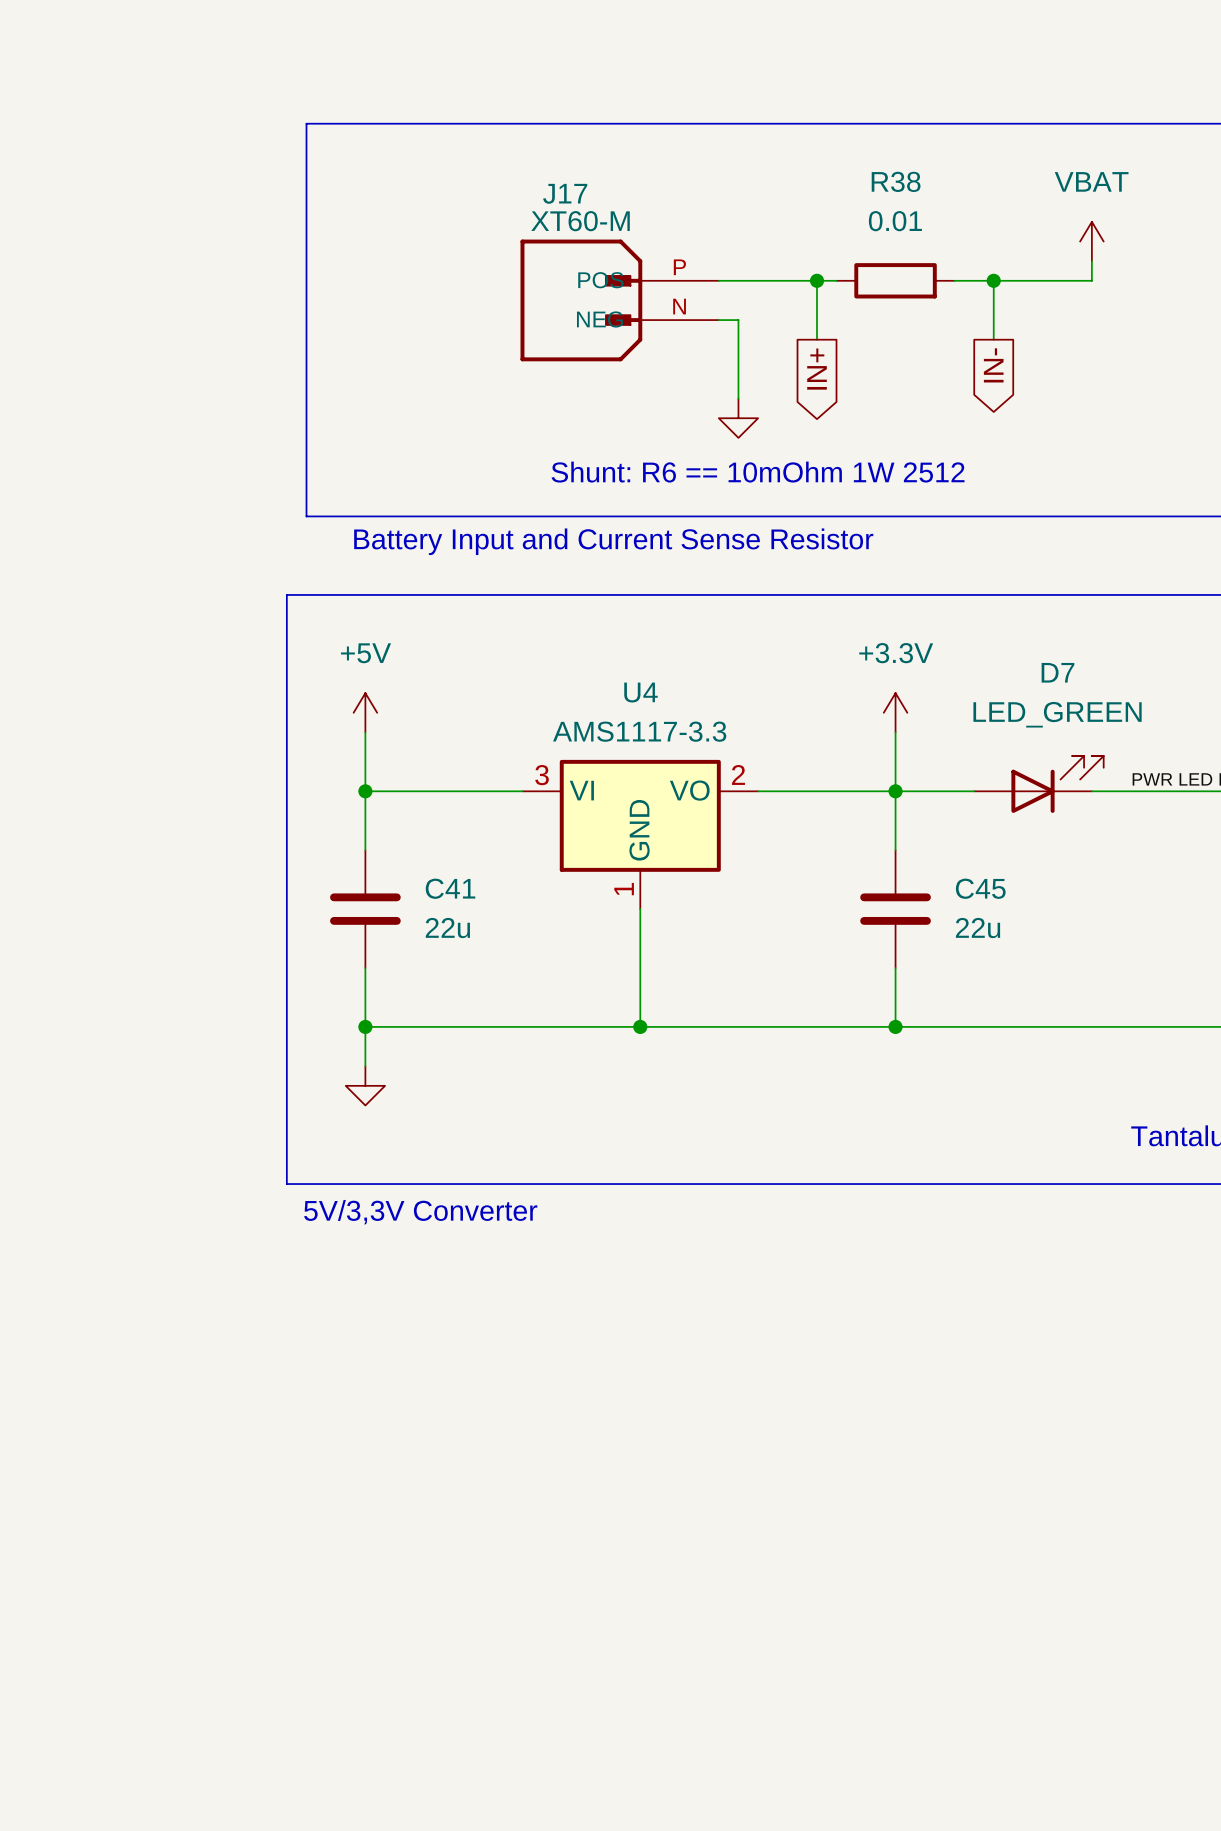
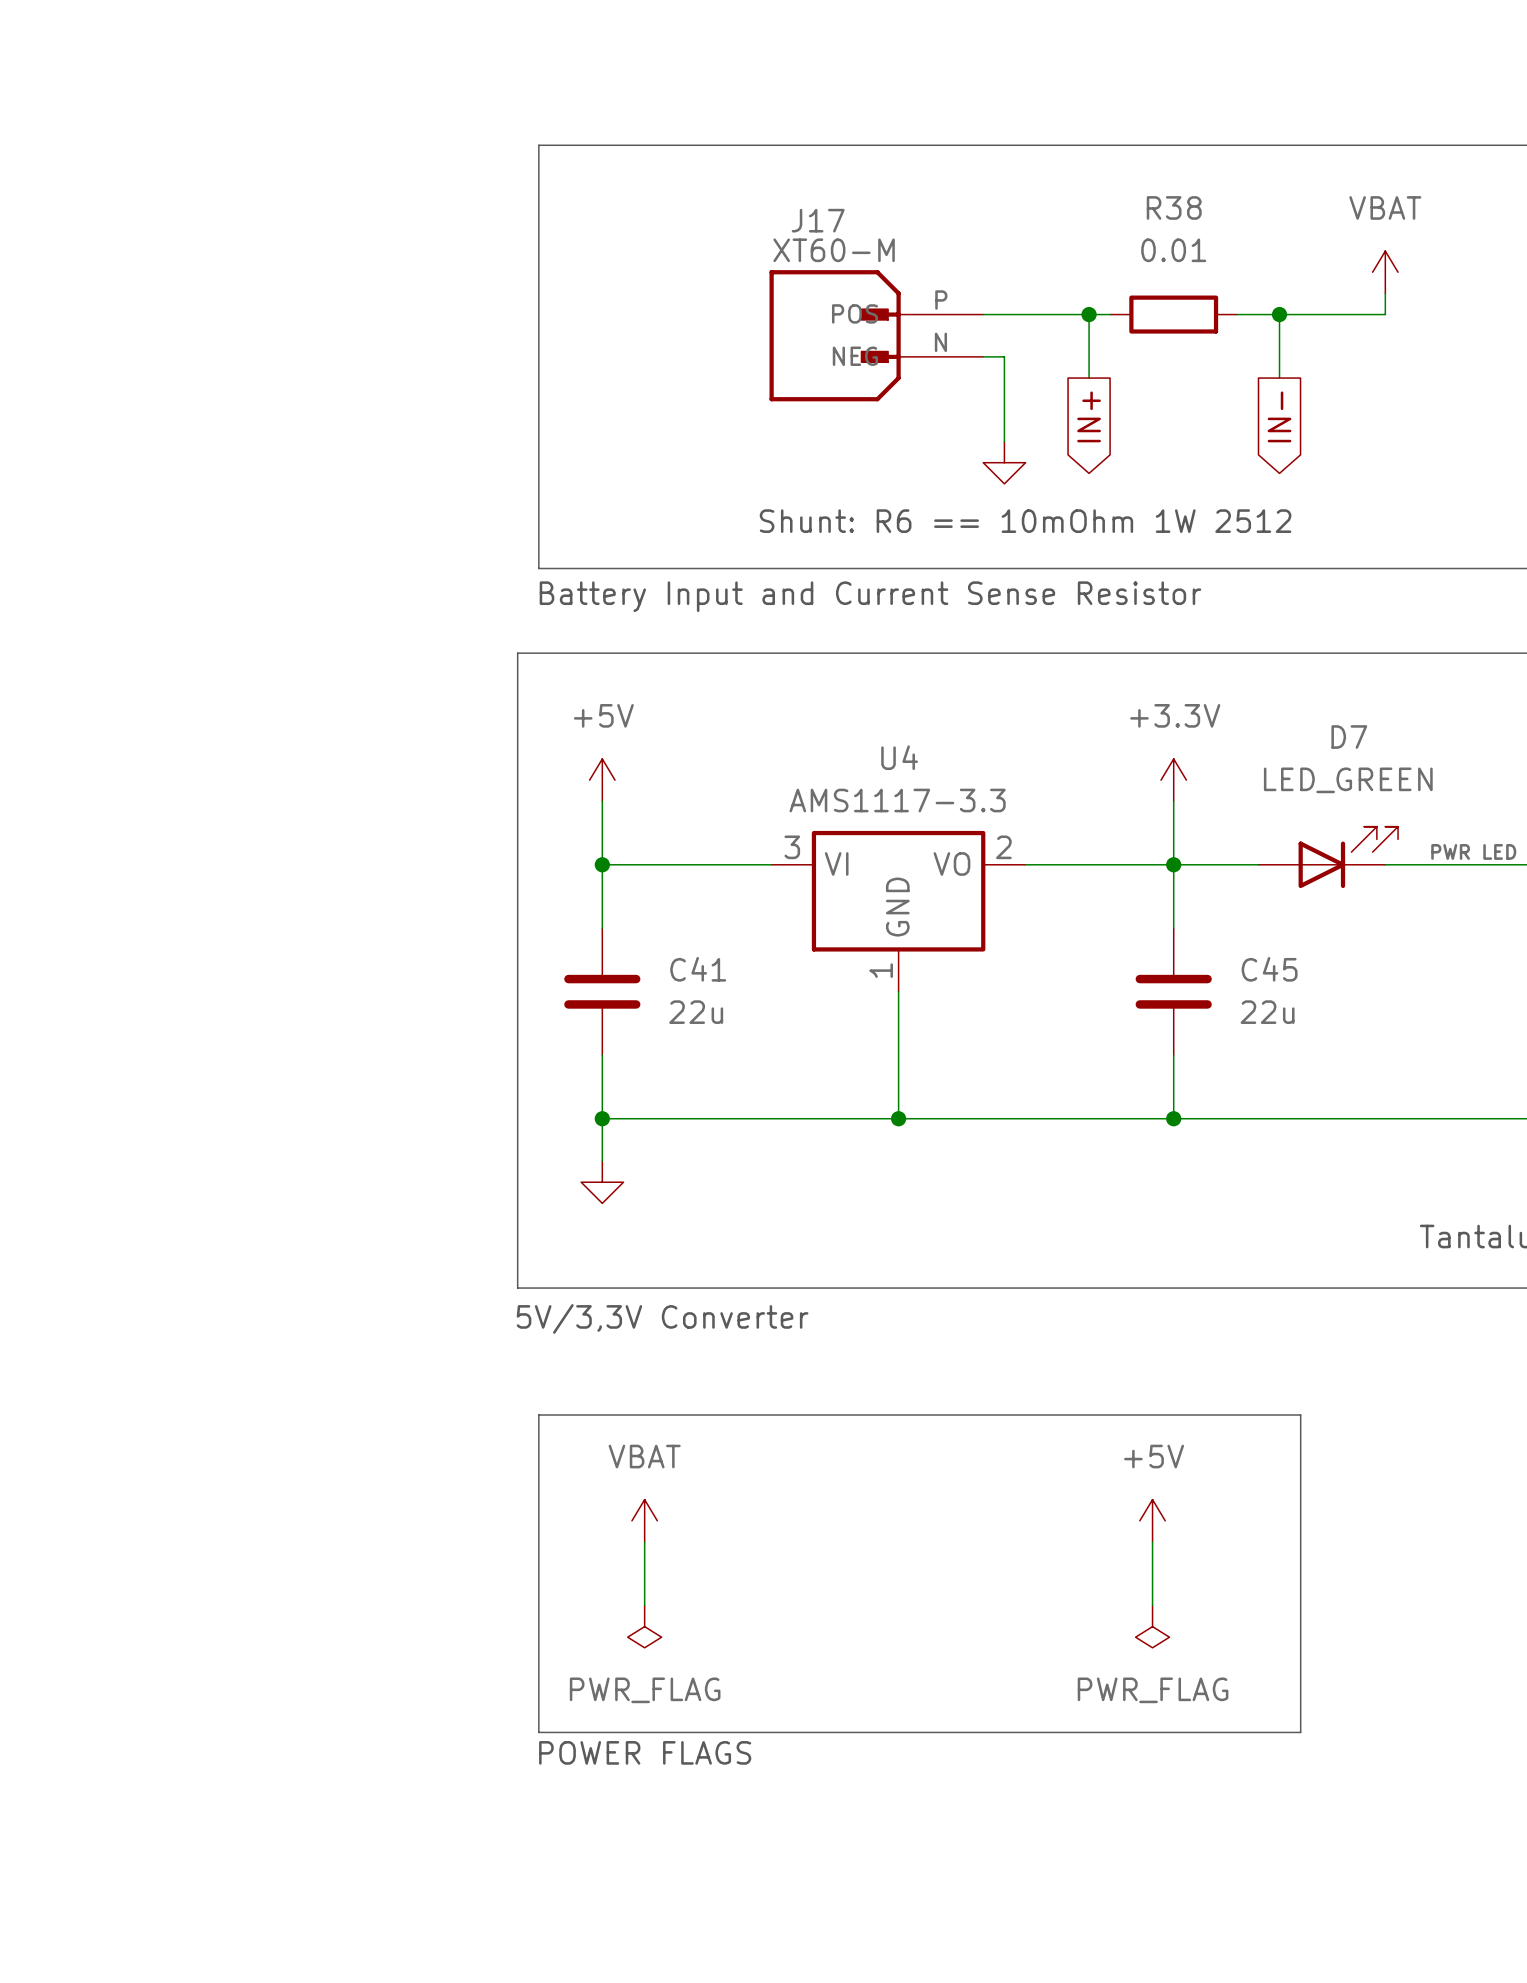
line: none -> (538, 1415) (1300, 1415) (1300, 1732) (538, 1732) (538, 1415)
power symbol: none -> VBAT (644, 1520)
power symbol: none -> +5V (1152, 1520)
wire: none -> (644, 1541) (644, 1605)
wire: none -> (1152, 1541) (1152, 1605)
power symbol: none -> PWR_FLAG (644, 1626)
power symbol: none -> PWR_FLAG (1152, 1626)
text: none -> POWER FLAGS (645, 1752)

